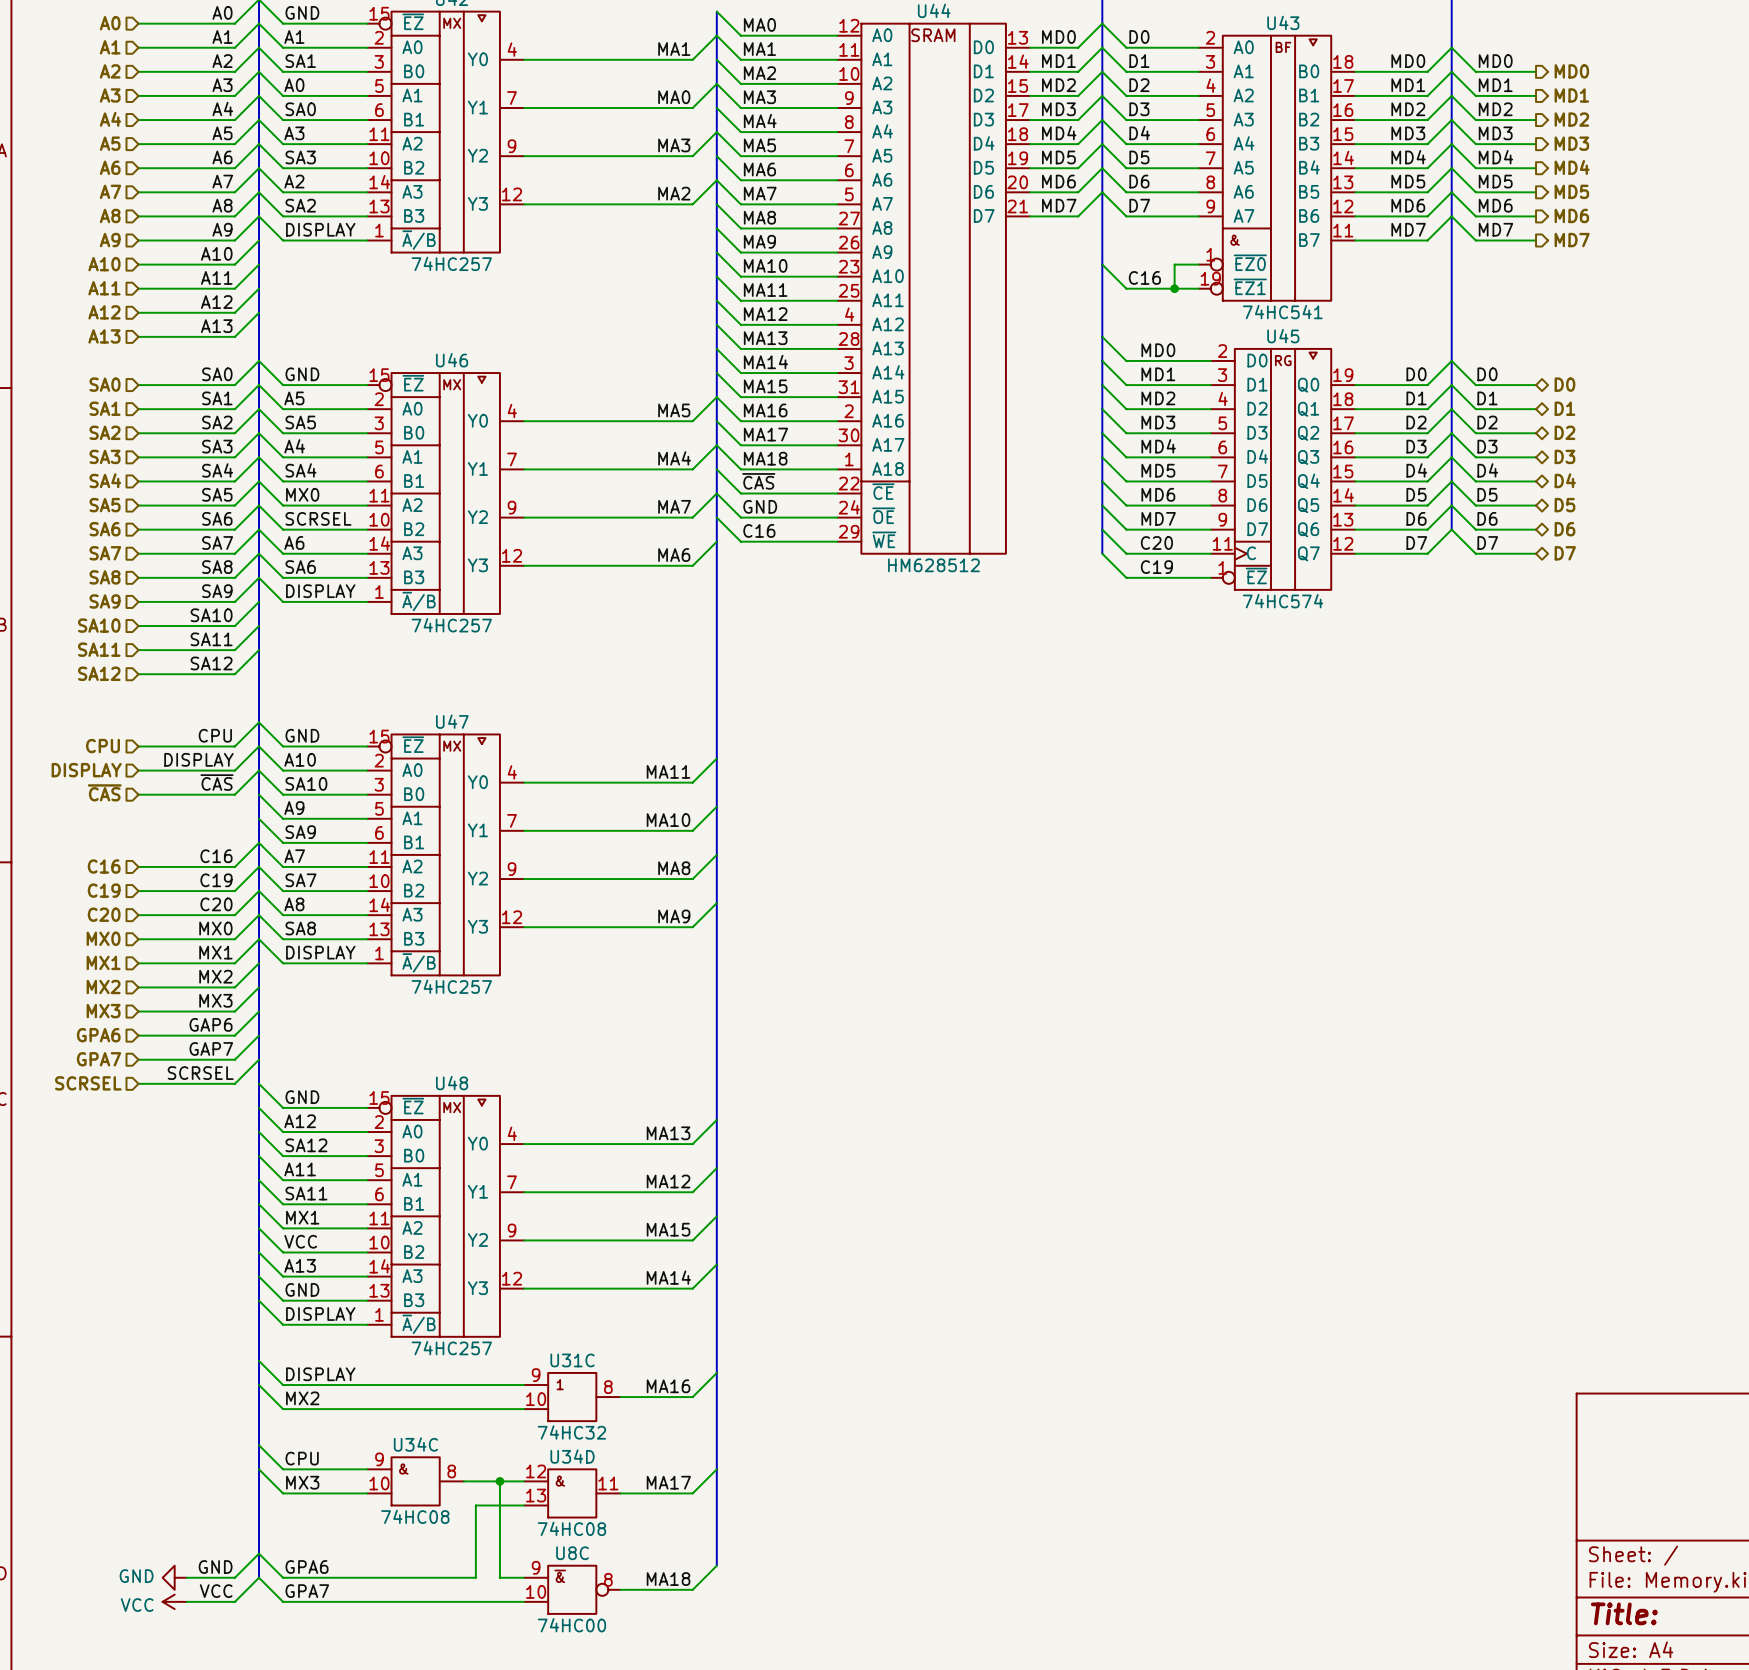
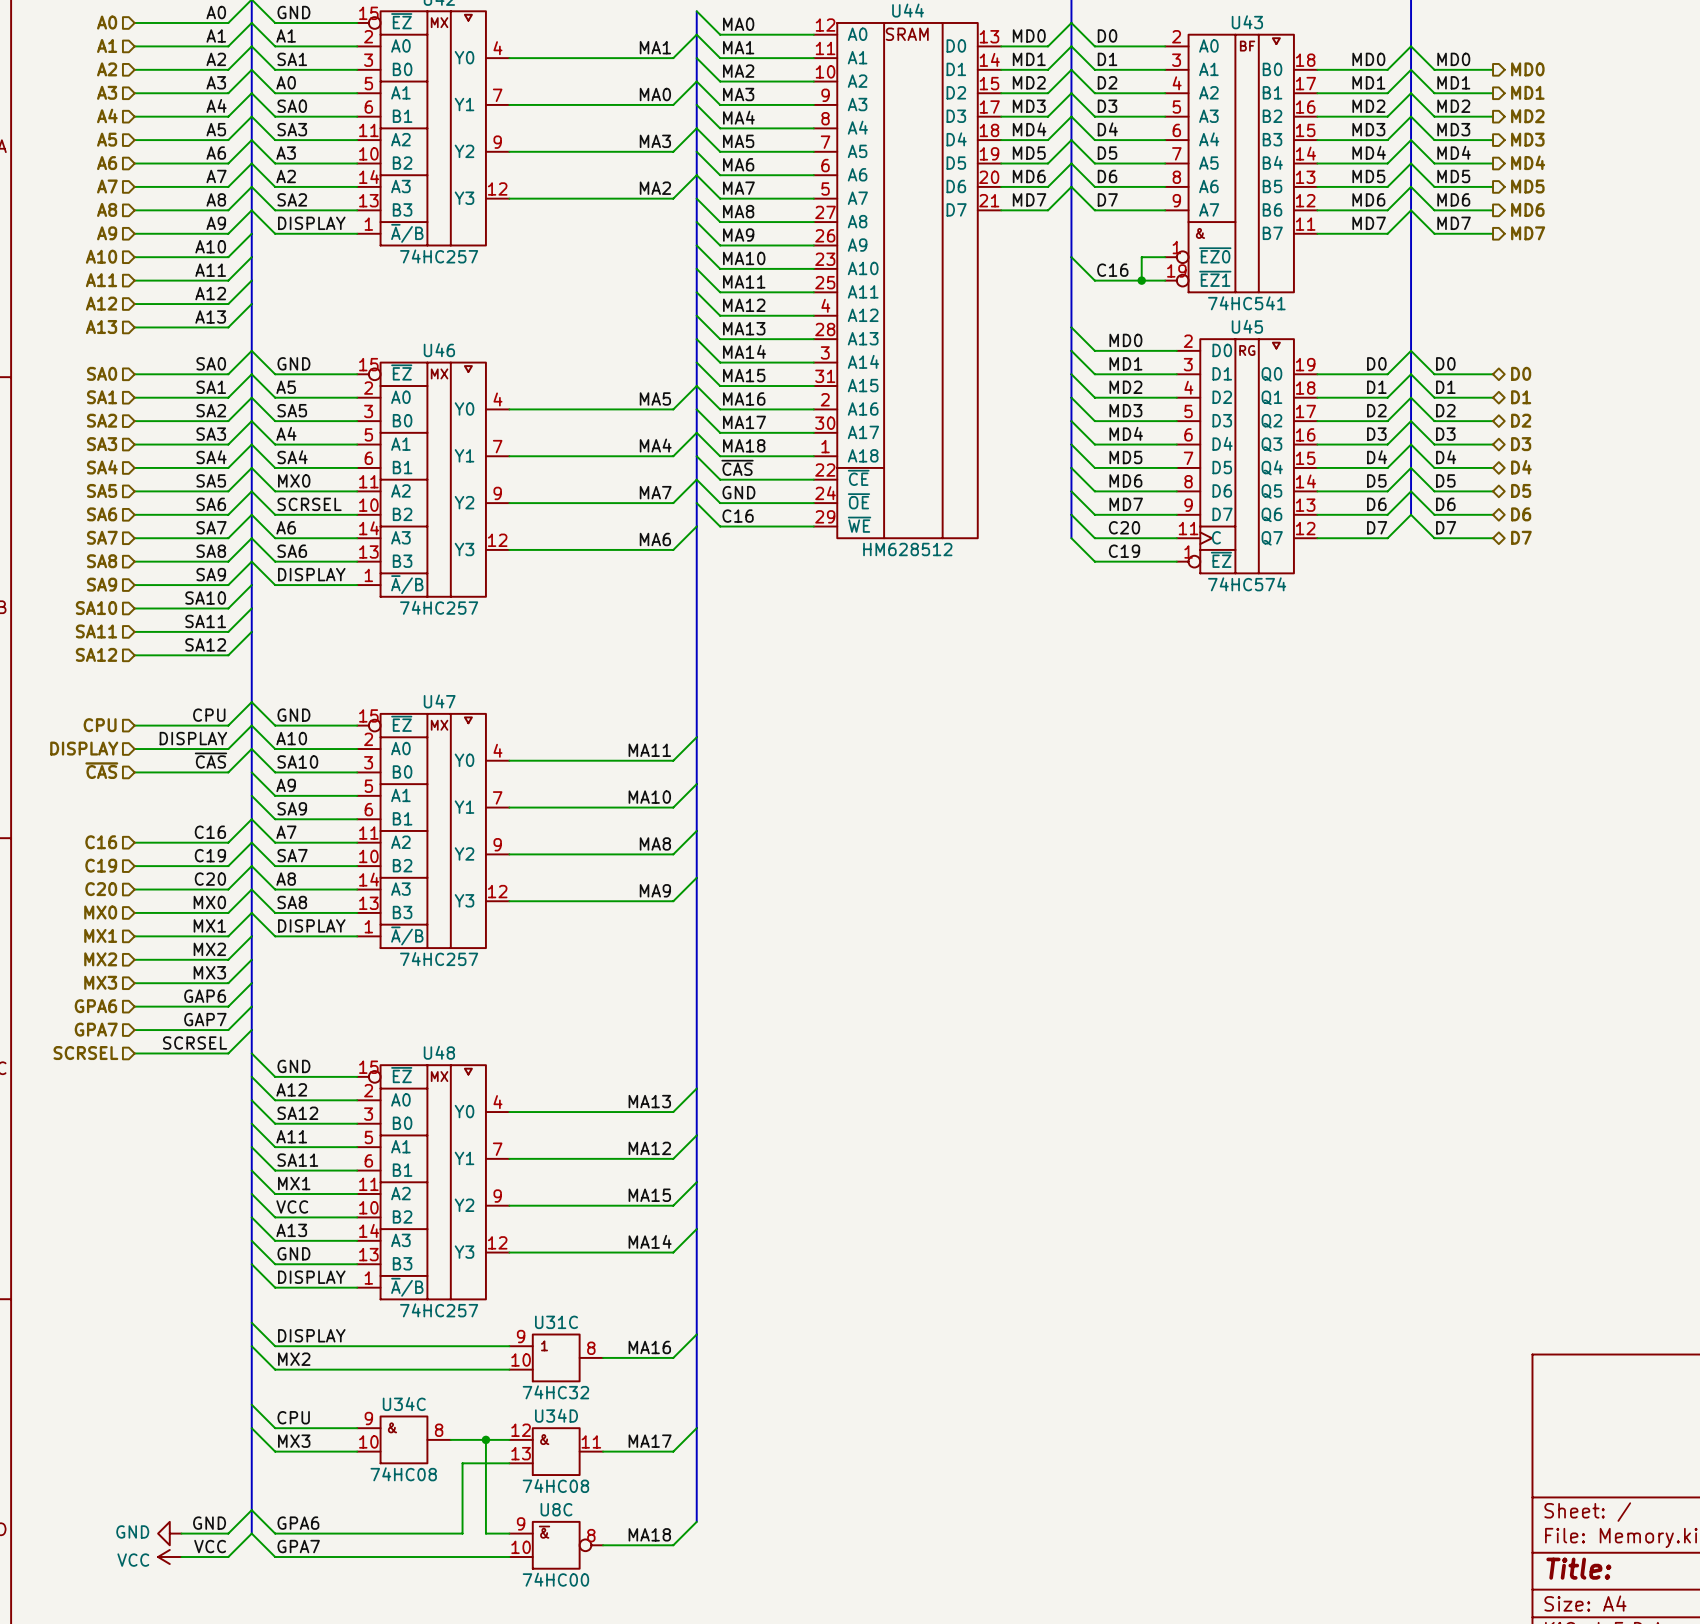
label: A3 (294, 133) -> SA3 (292, 129)
label: SA3 (300, 157) -> A3 (286, 153)

